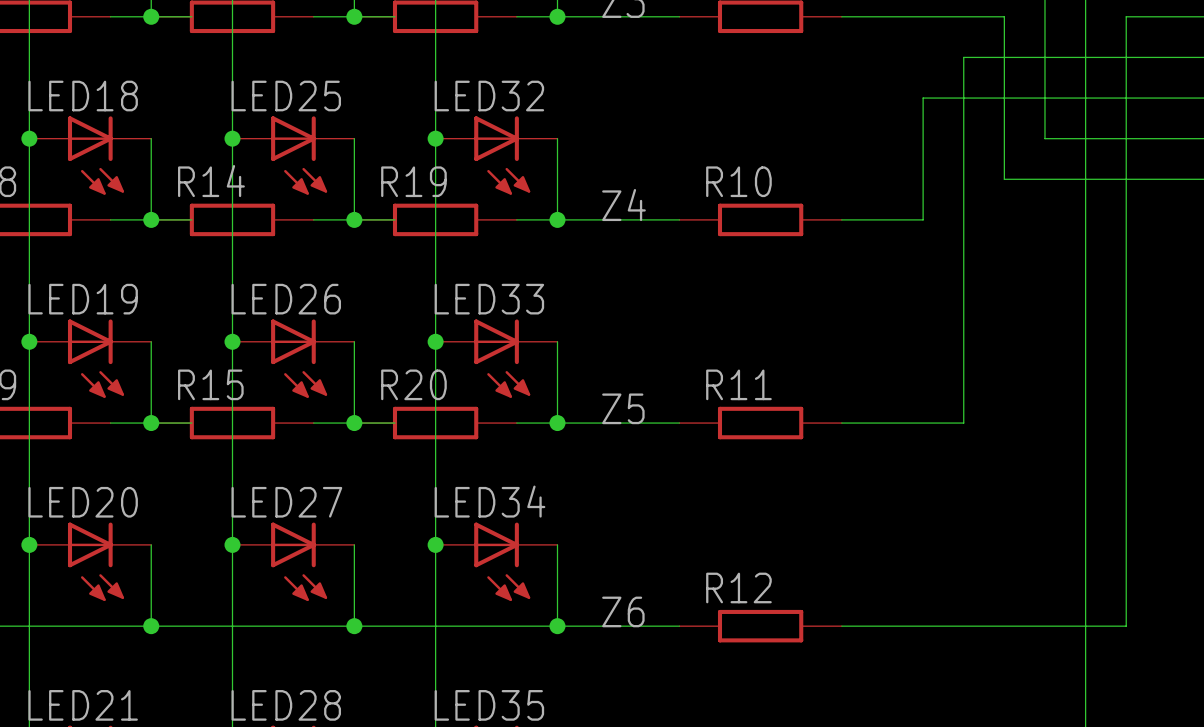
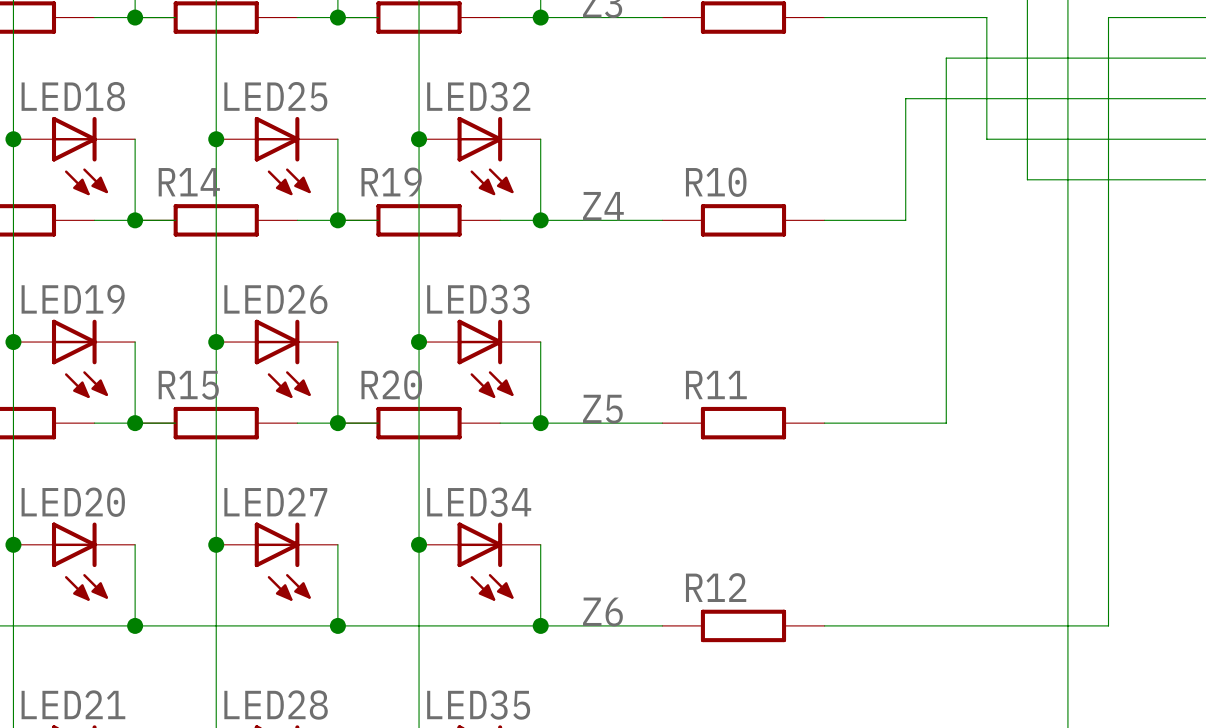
wire: (1004, 138) (1004, 179) (1044, 179) -> (986, 139) (1027, 139) (1027, 179)

